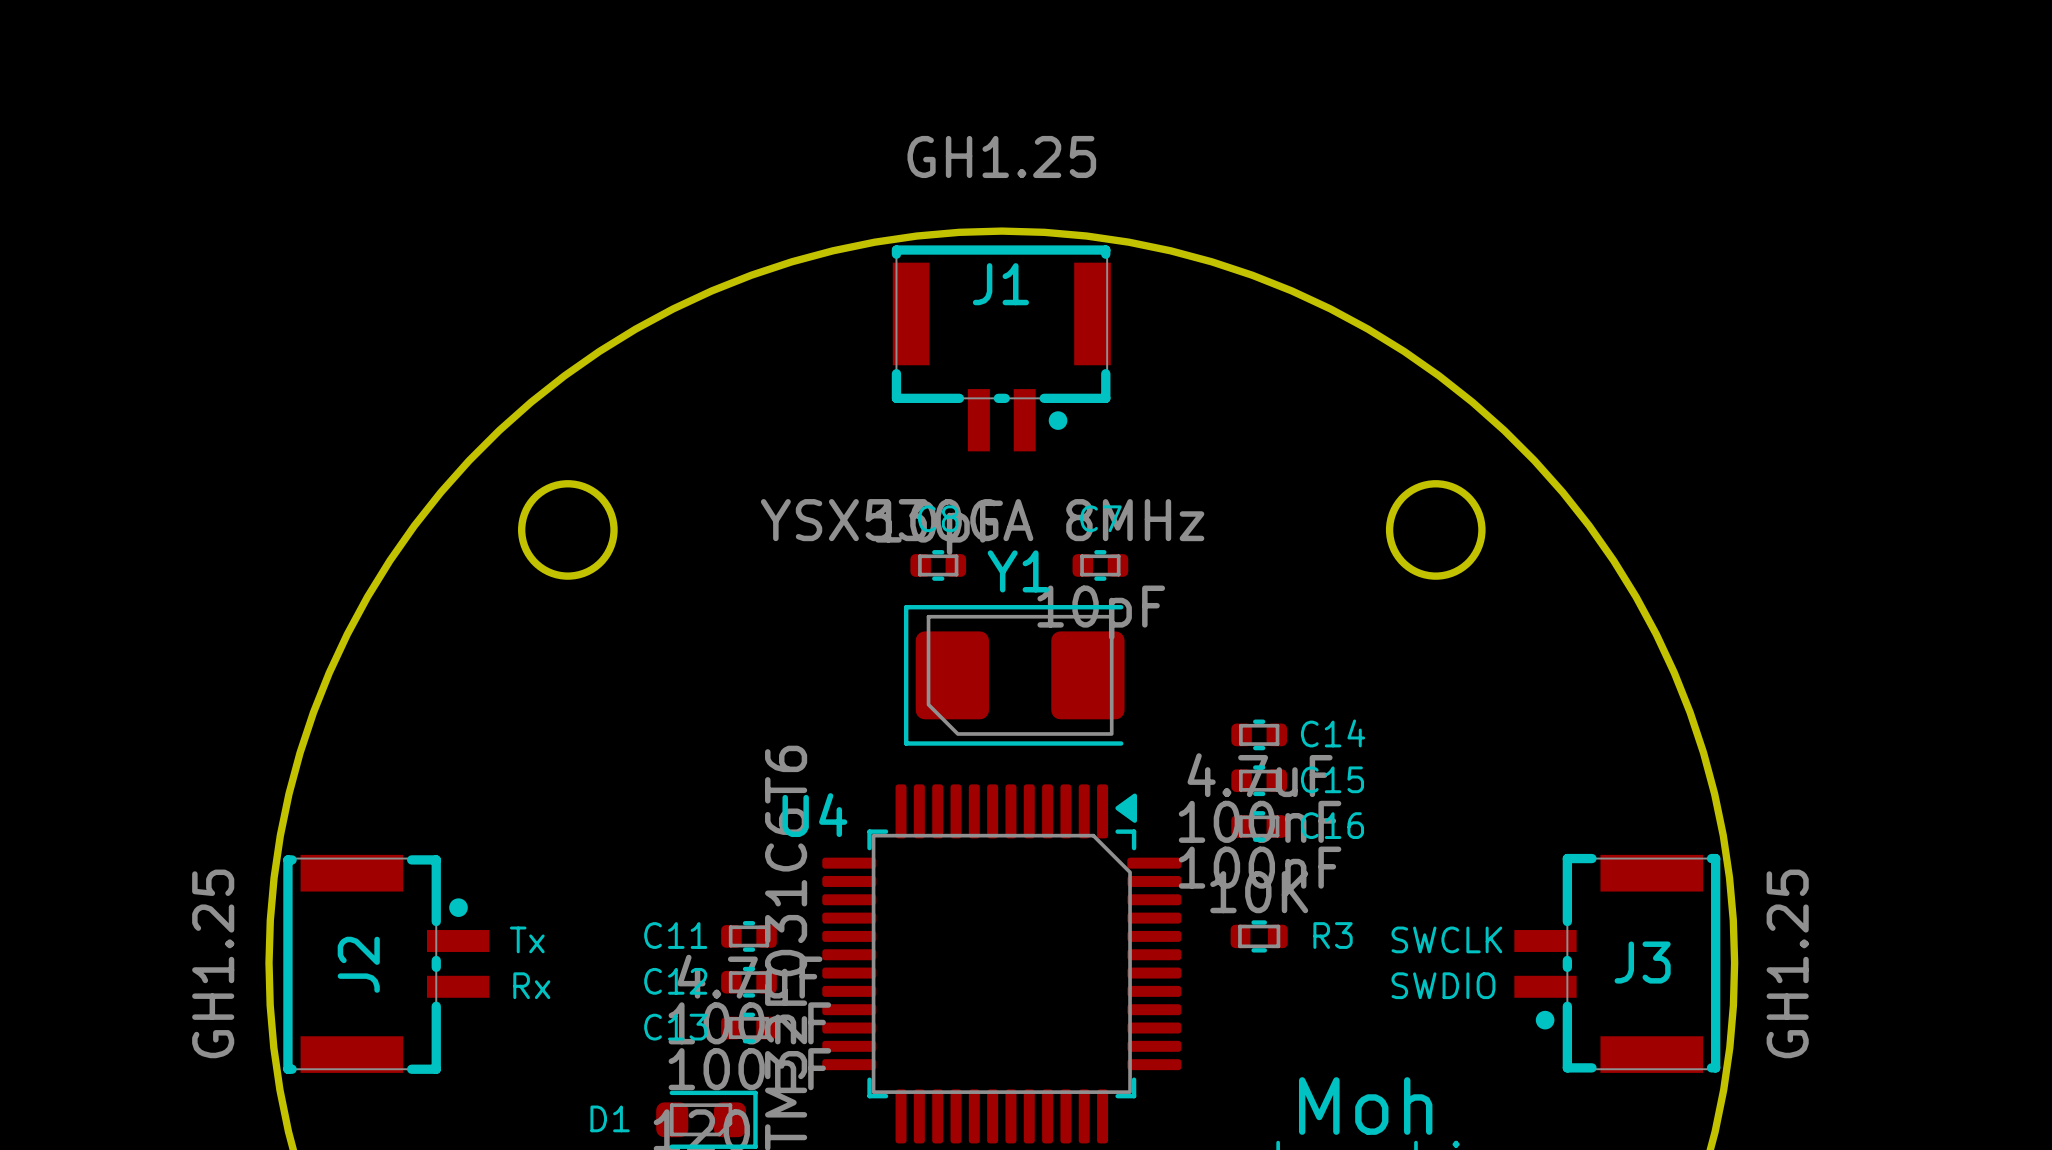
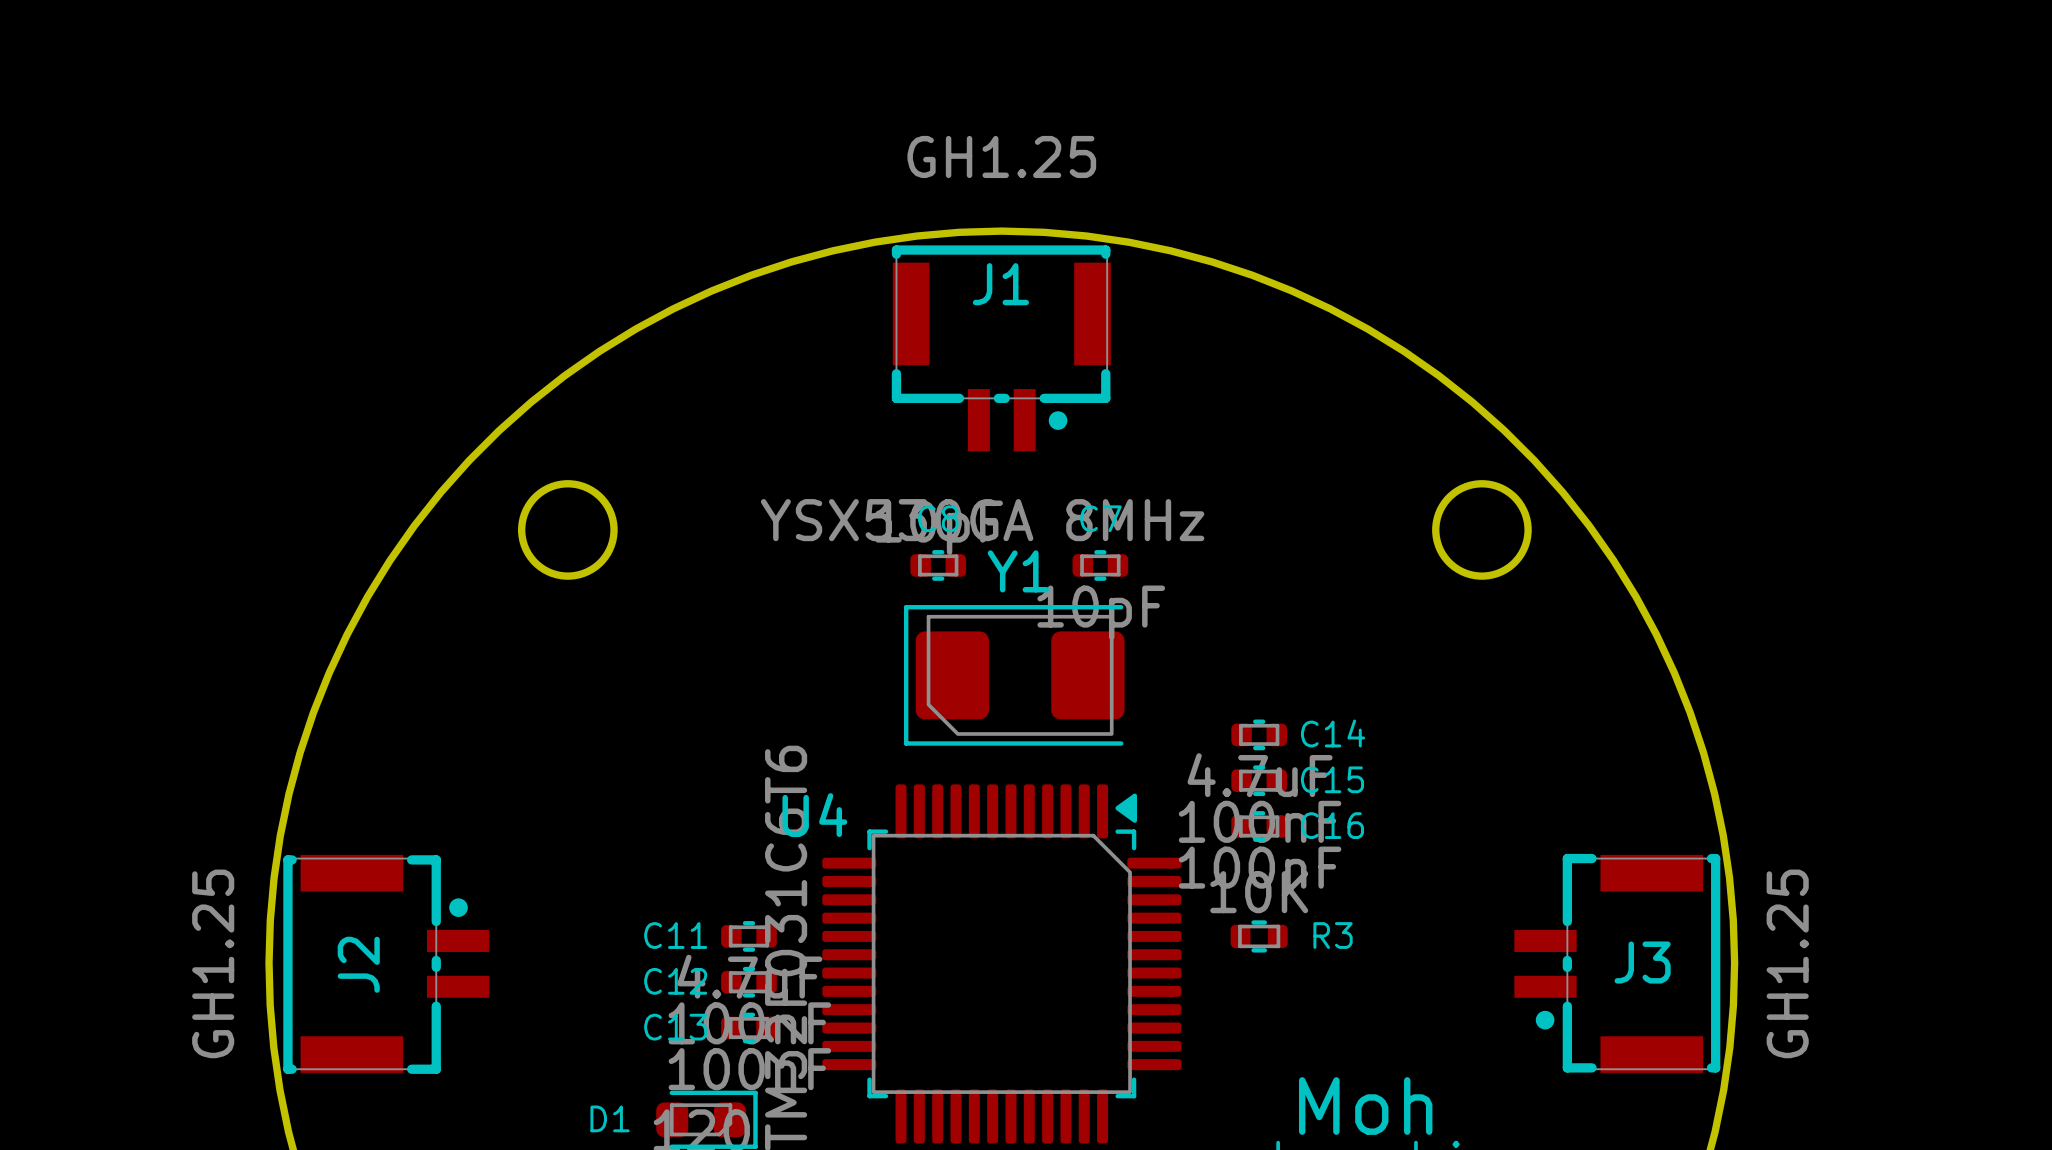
round board edge position: (1435, 529) -> (1481, 529)
text: Tx (527, 939) -> none
text: SWCLK (1446, 939) -> none
text: Rx (531, 985) -> none
text: SWDIO (1443, 985) -> none

